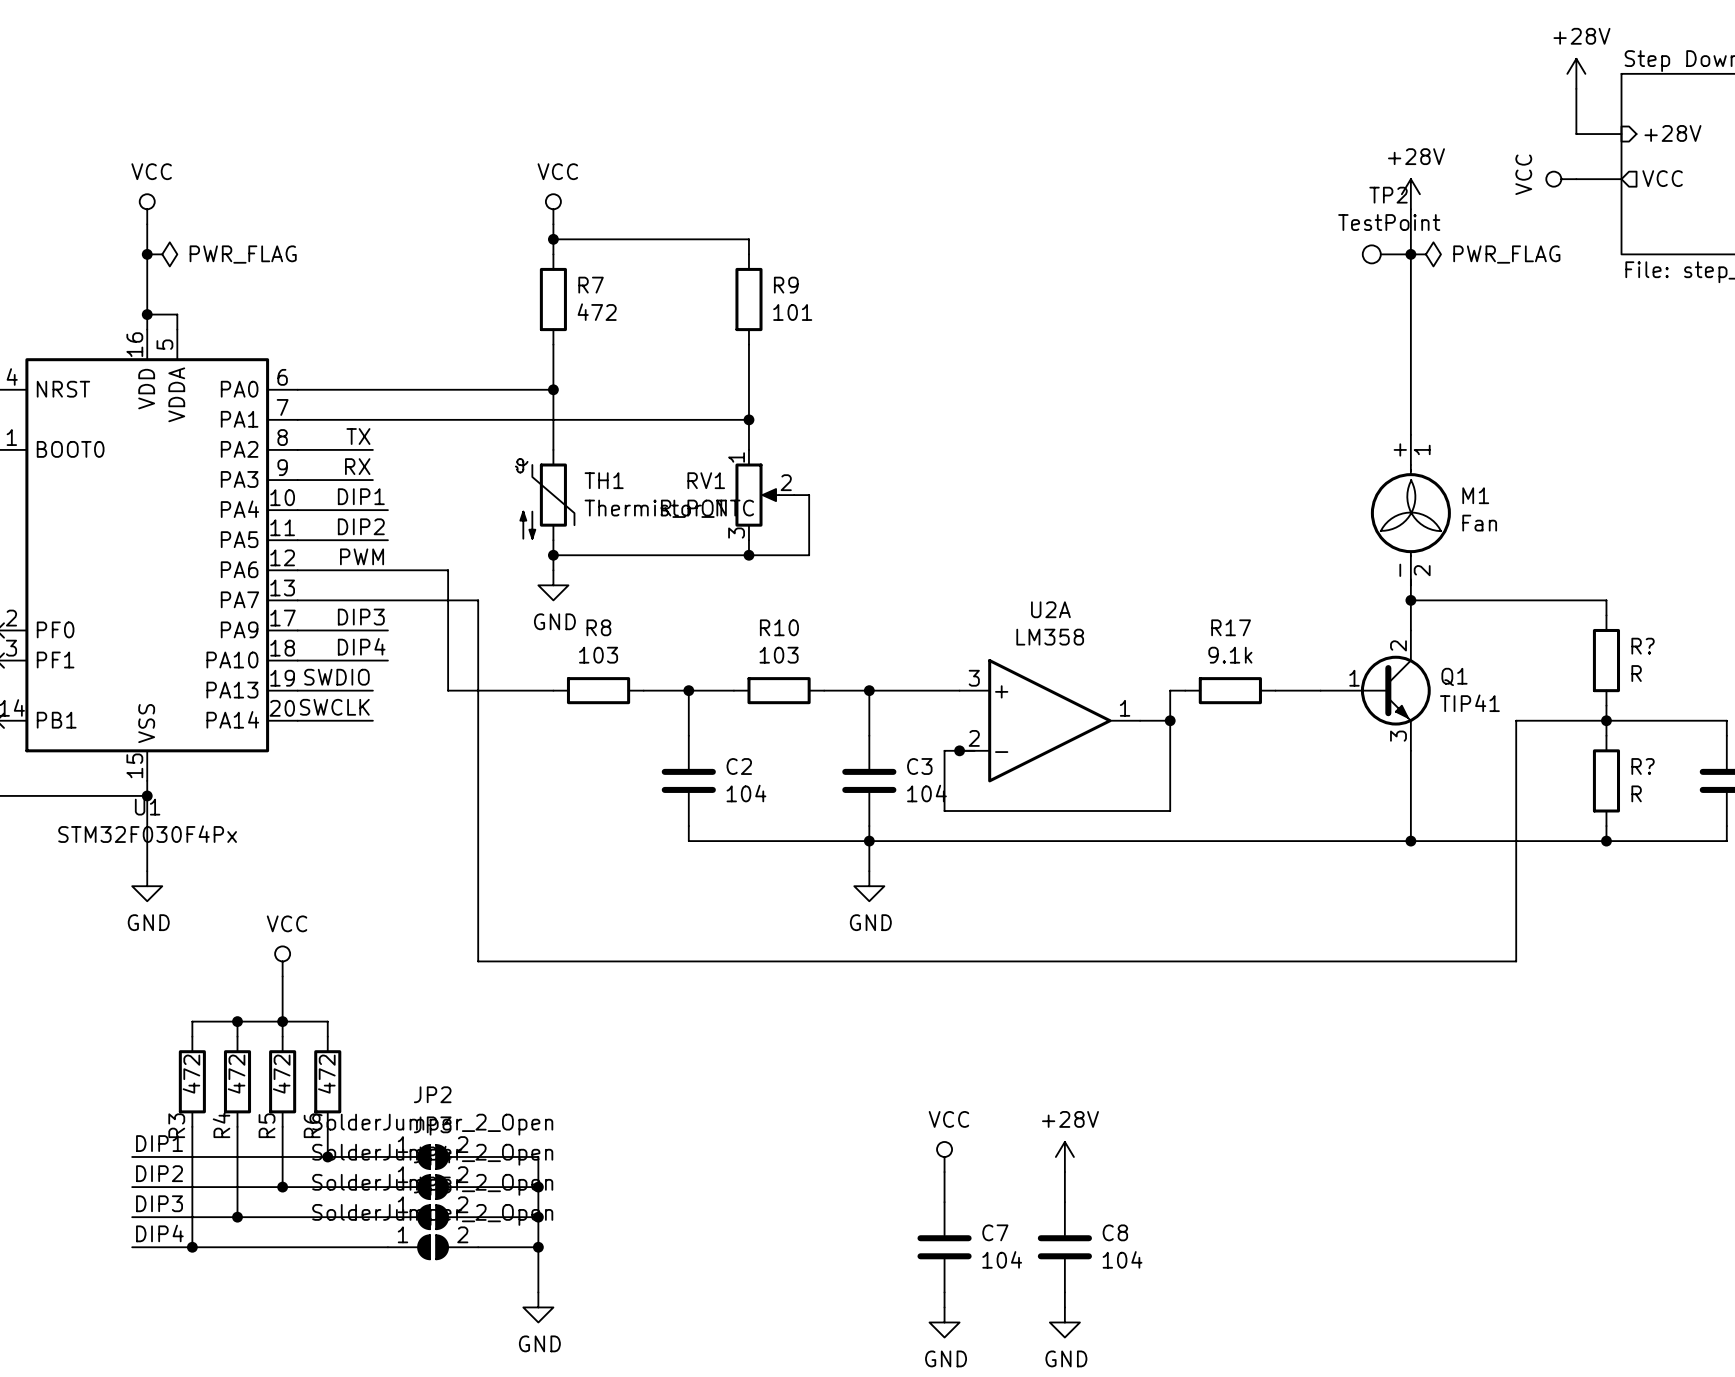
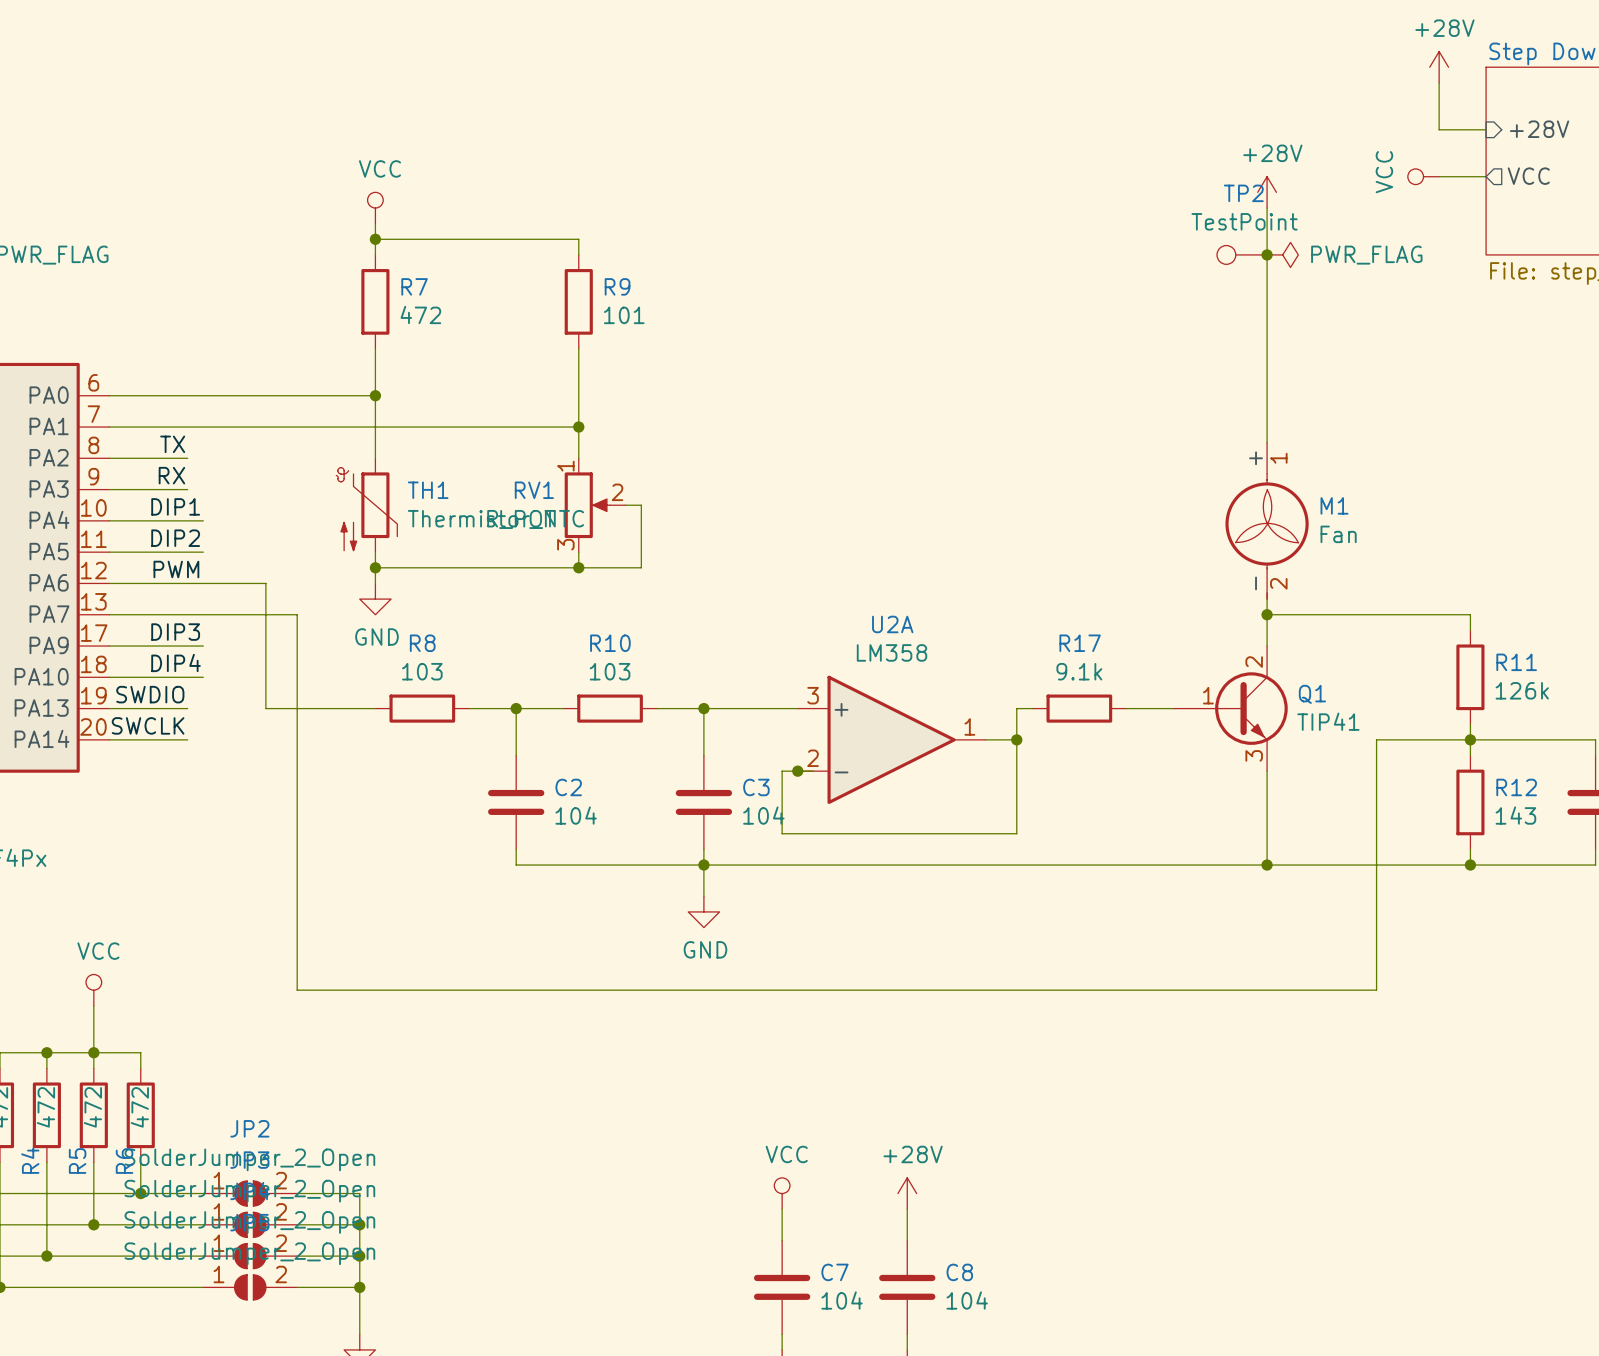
R? name: R? (1643, 646) -> R11 (1516, 662)
R? value: R (1636, 673) -> 126k (1522, 690)
R? name: R? (1643, 766) -> R12 (1516, 787)
R? value: R (1636, 793) -> 143 (1515, 815)

